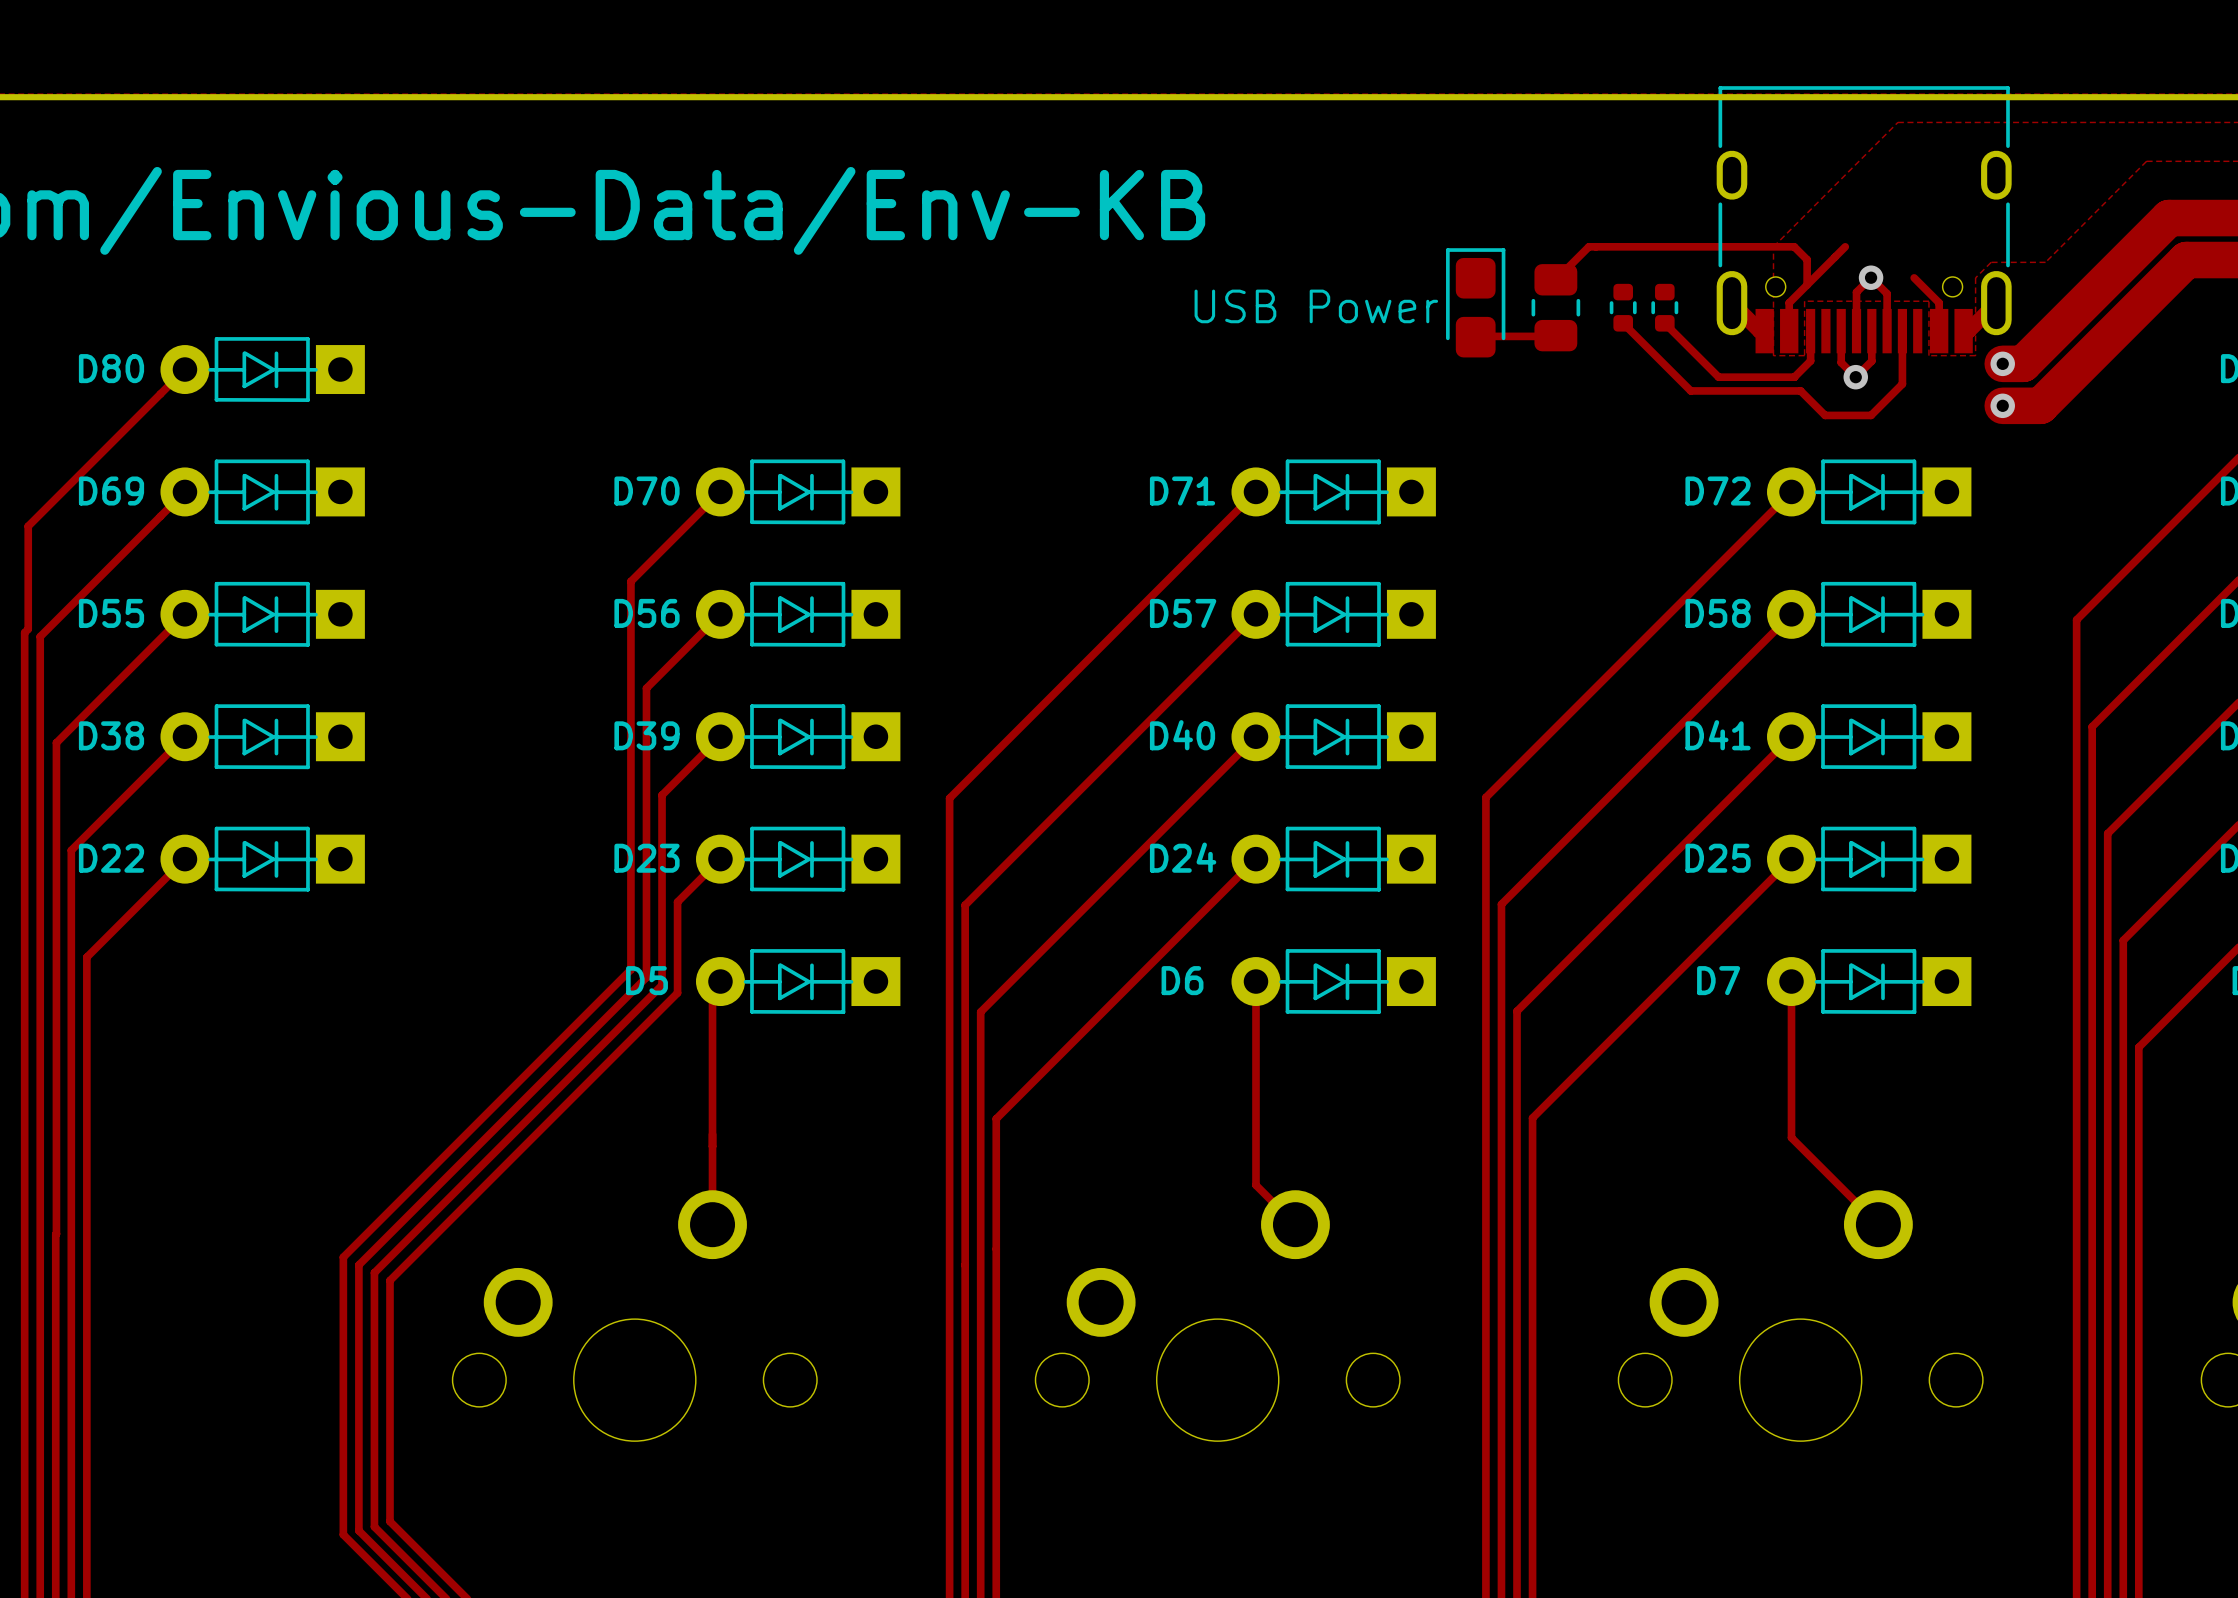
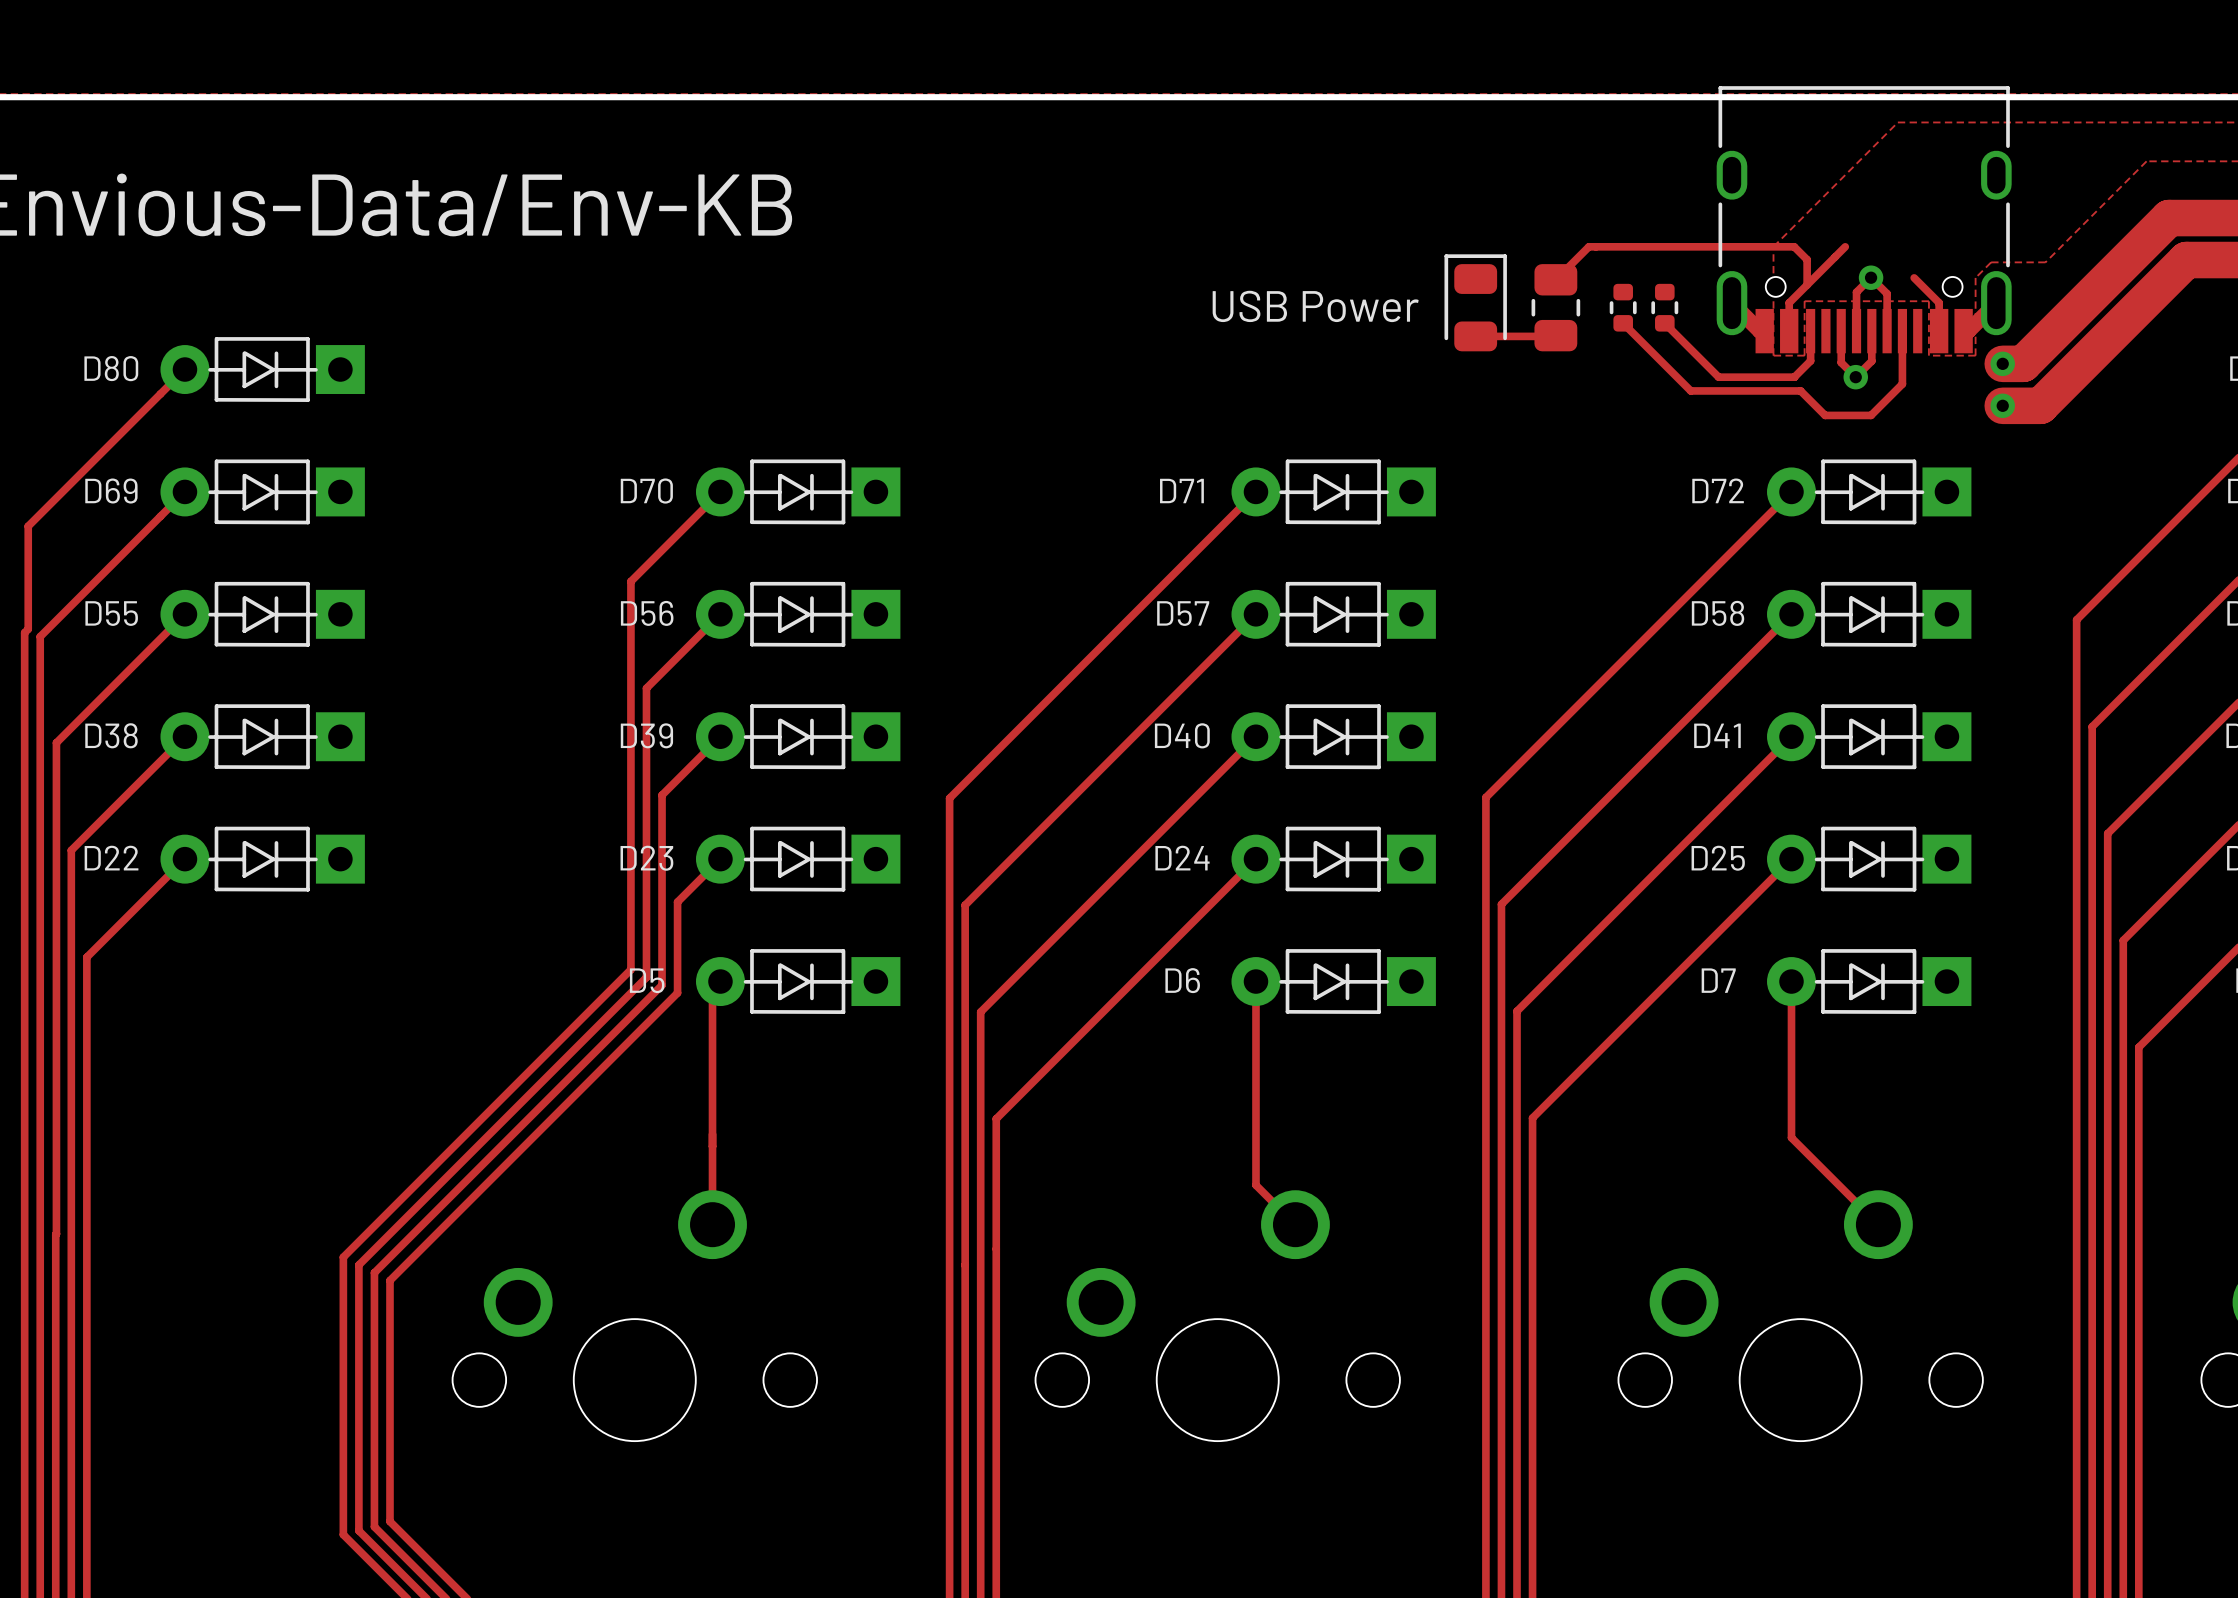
part footprint: [1446, 248, 1506, 358] -> [1444, 254, 1507, 352]

